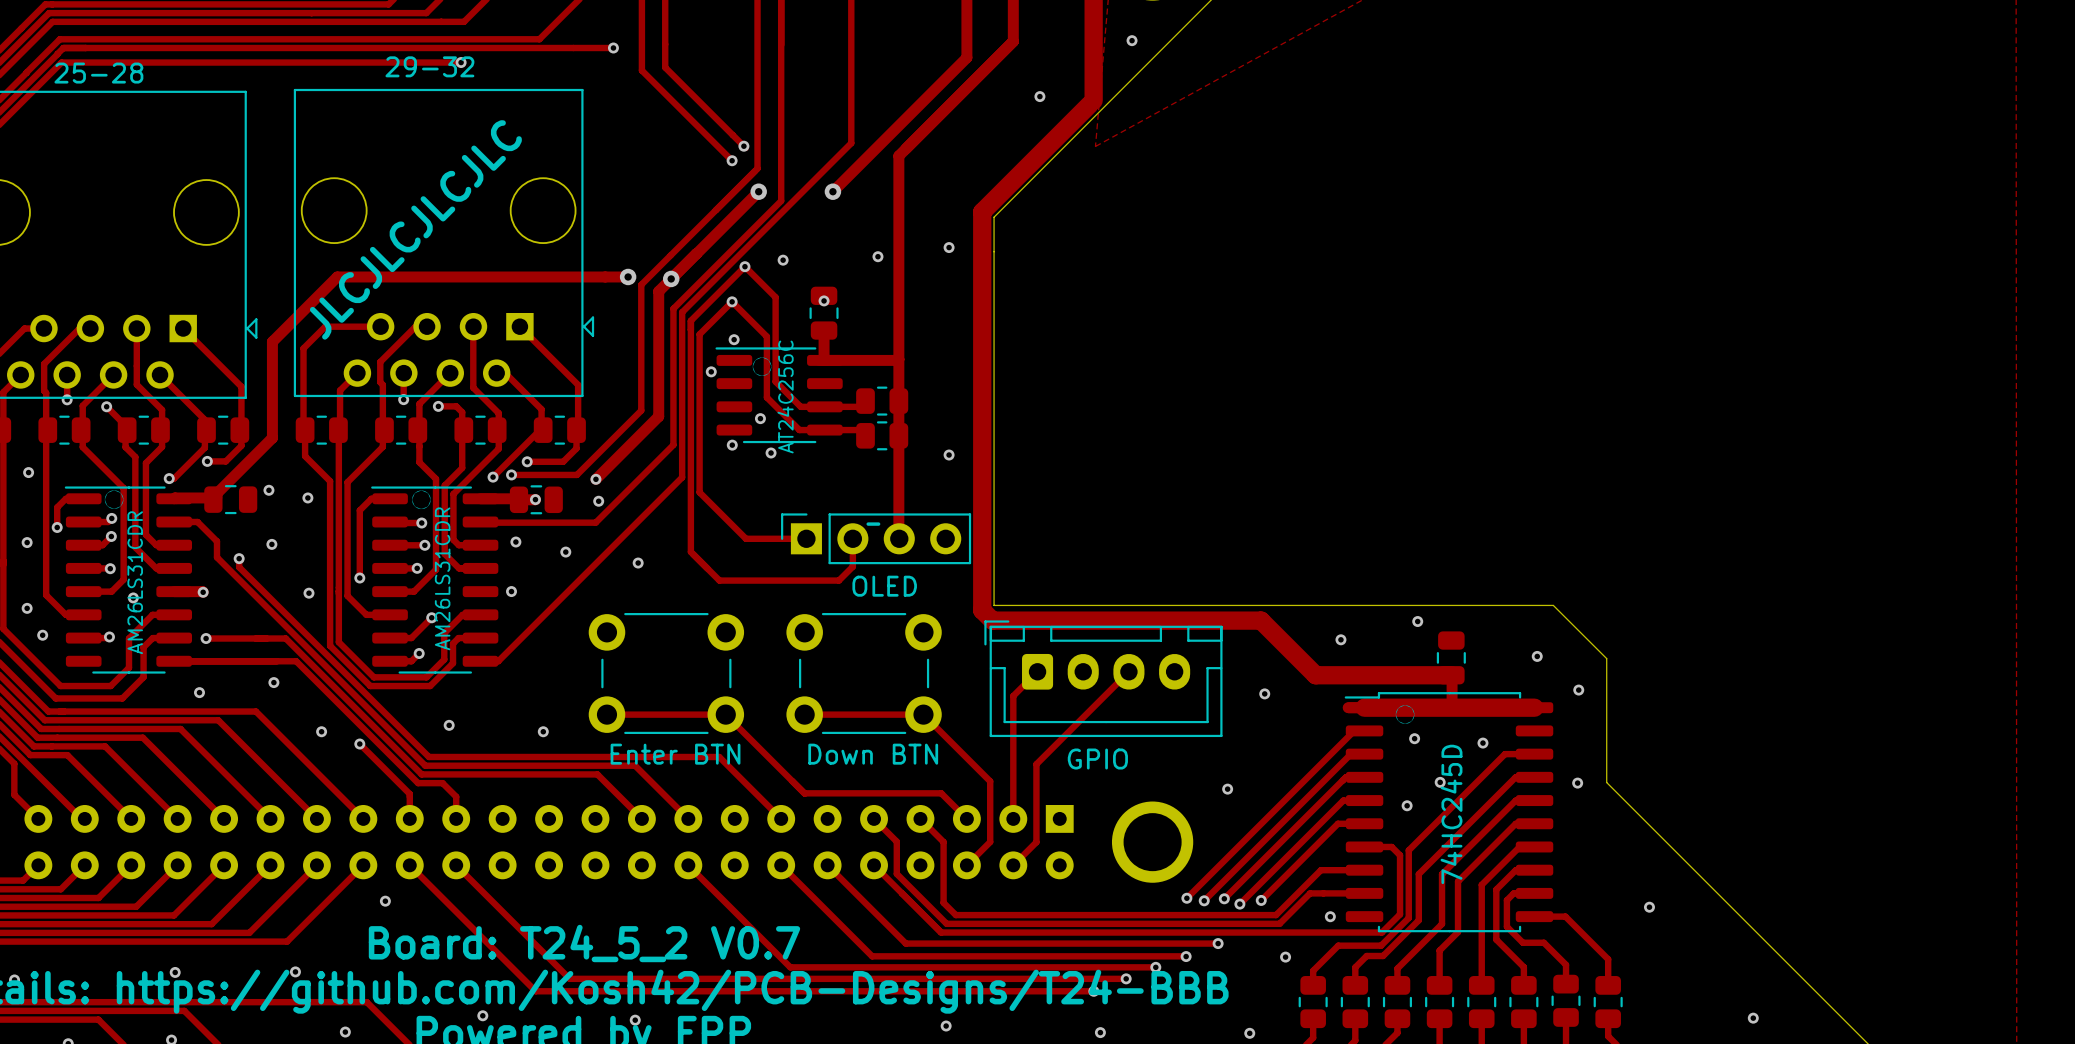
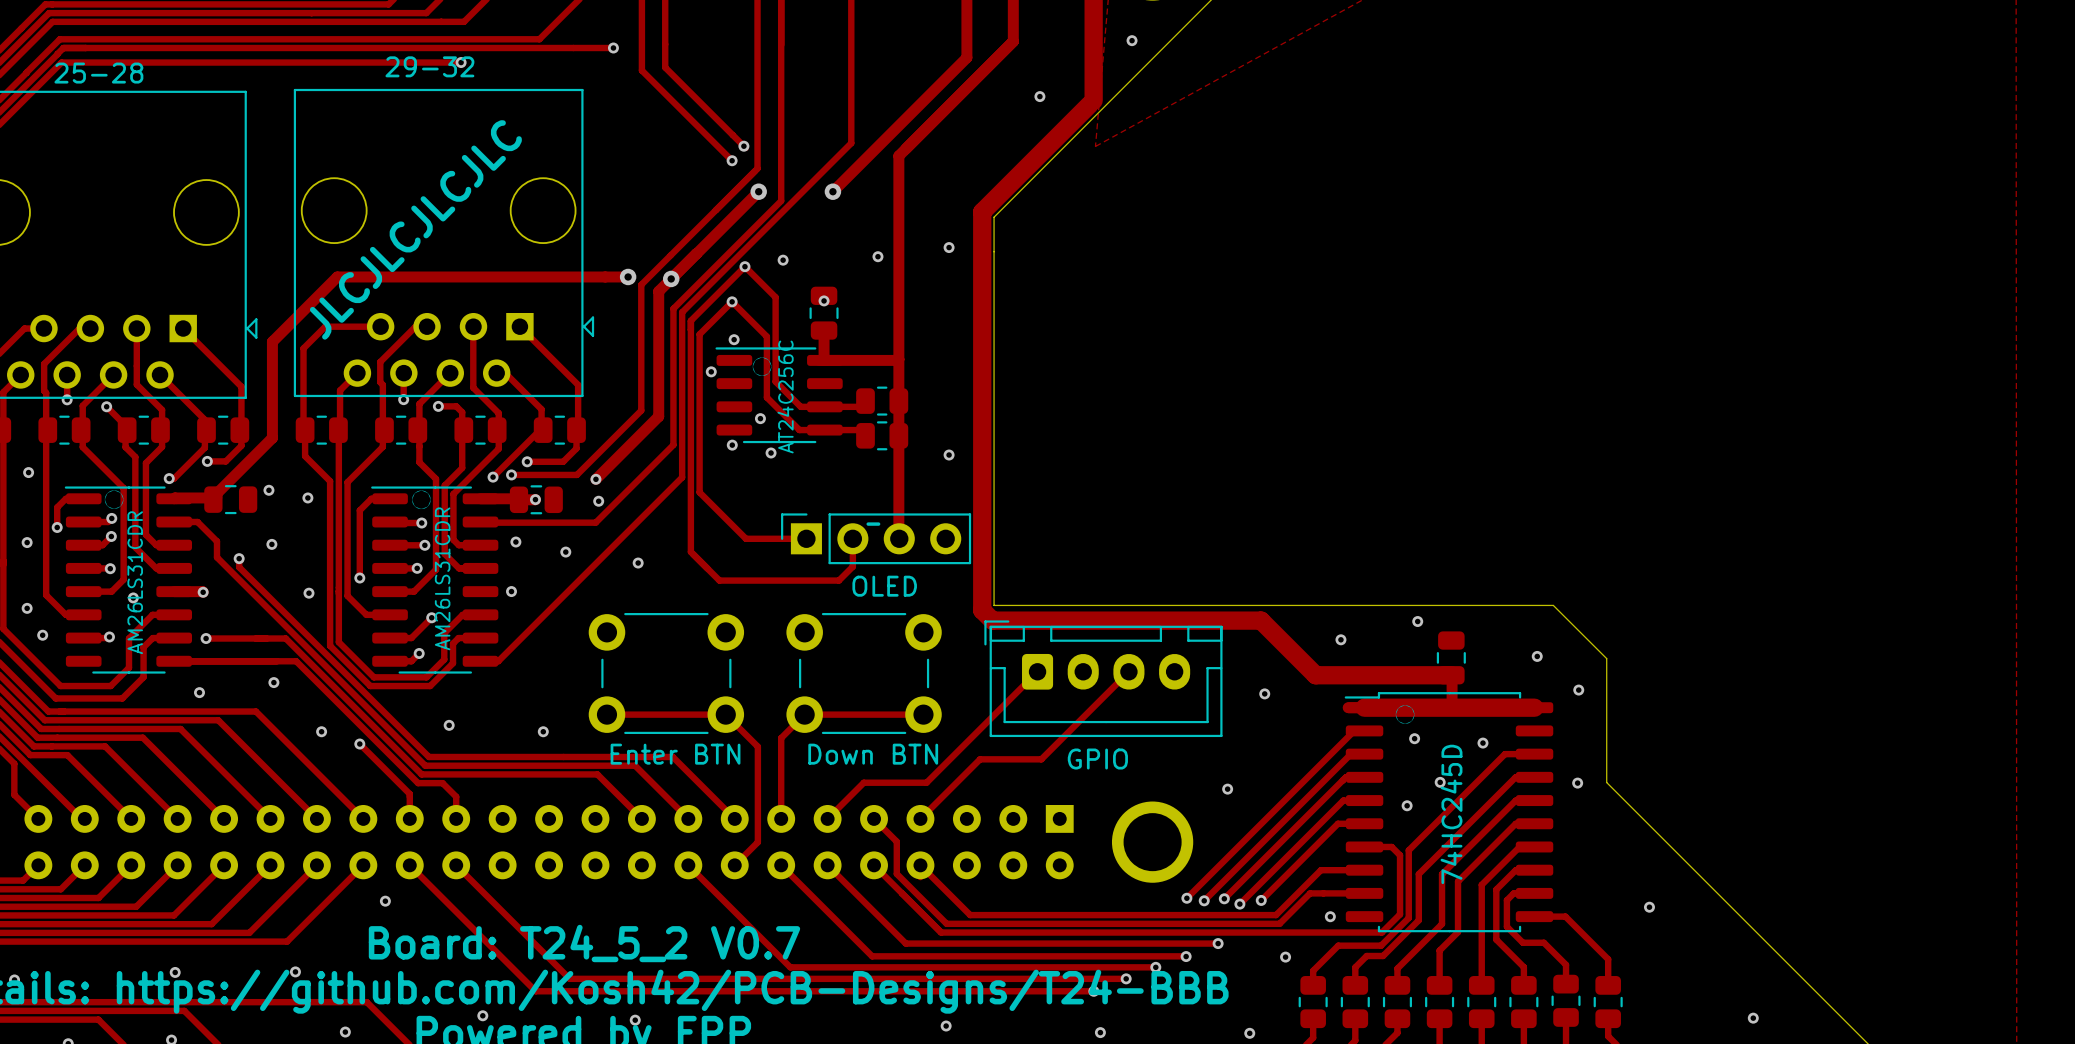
track: (1013, 696) (1013, 818) -> (1013, 696) (926, 782) (863, 782) (827, 818)
track: none -> (804, 714) (781, 738) (781, 818)
track: (923, 714) (990, 781) (990, 842) (966, 865) -> none
track: (757, 746) (804, 793) -> (757, 746) (757, 842) (734, 865)
track: (672, 757) (719, 757) (781, 818) -> (672, 757) (734, 818)
track: (1041, 759) (1036, 764) (1036, 842) (1013, 865) -> (1041, 759) (980, 759) (920, 818)
track: (804, 793) (941, 793) (966, 818) -> none
track: (920, 818) (943, 842) (943, 902) (955, 915) (970, 915) -> (920, 877) (920, 865) (970, 915)

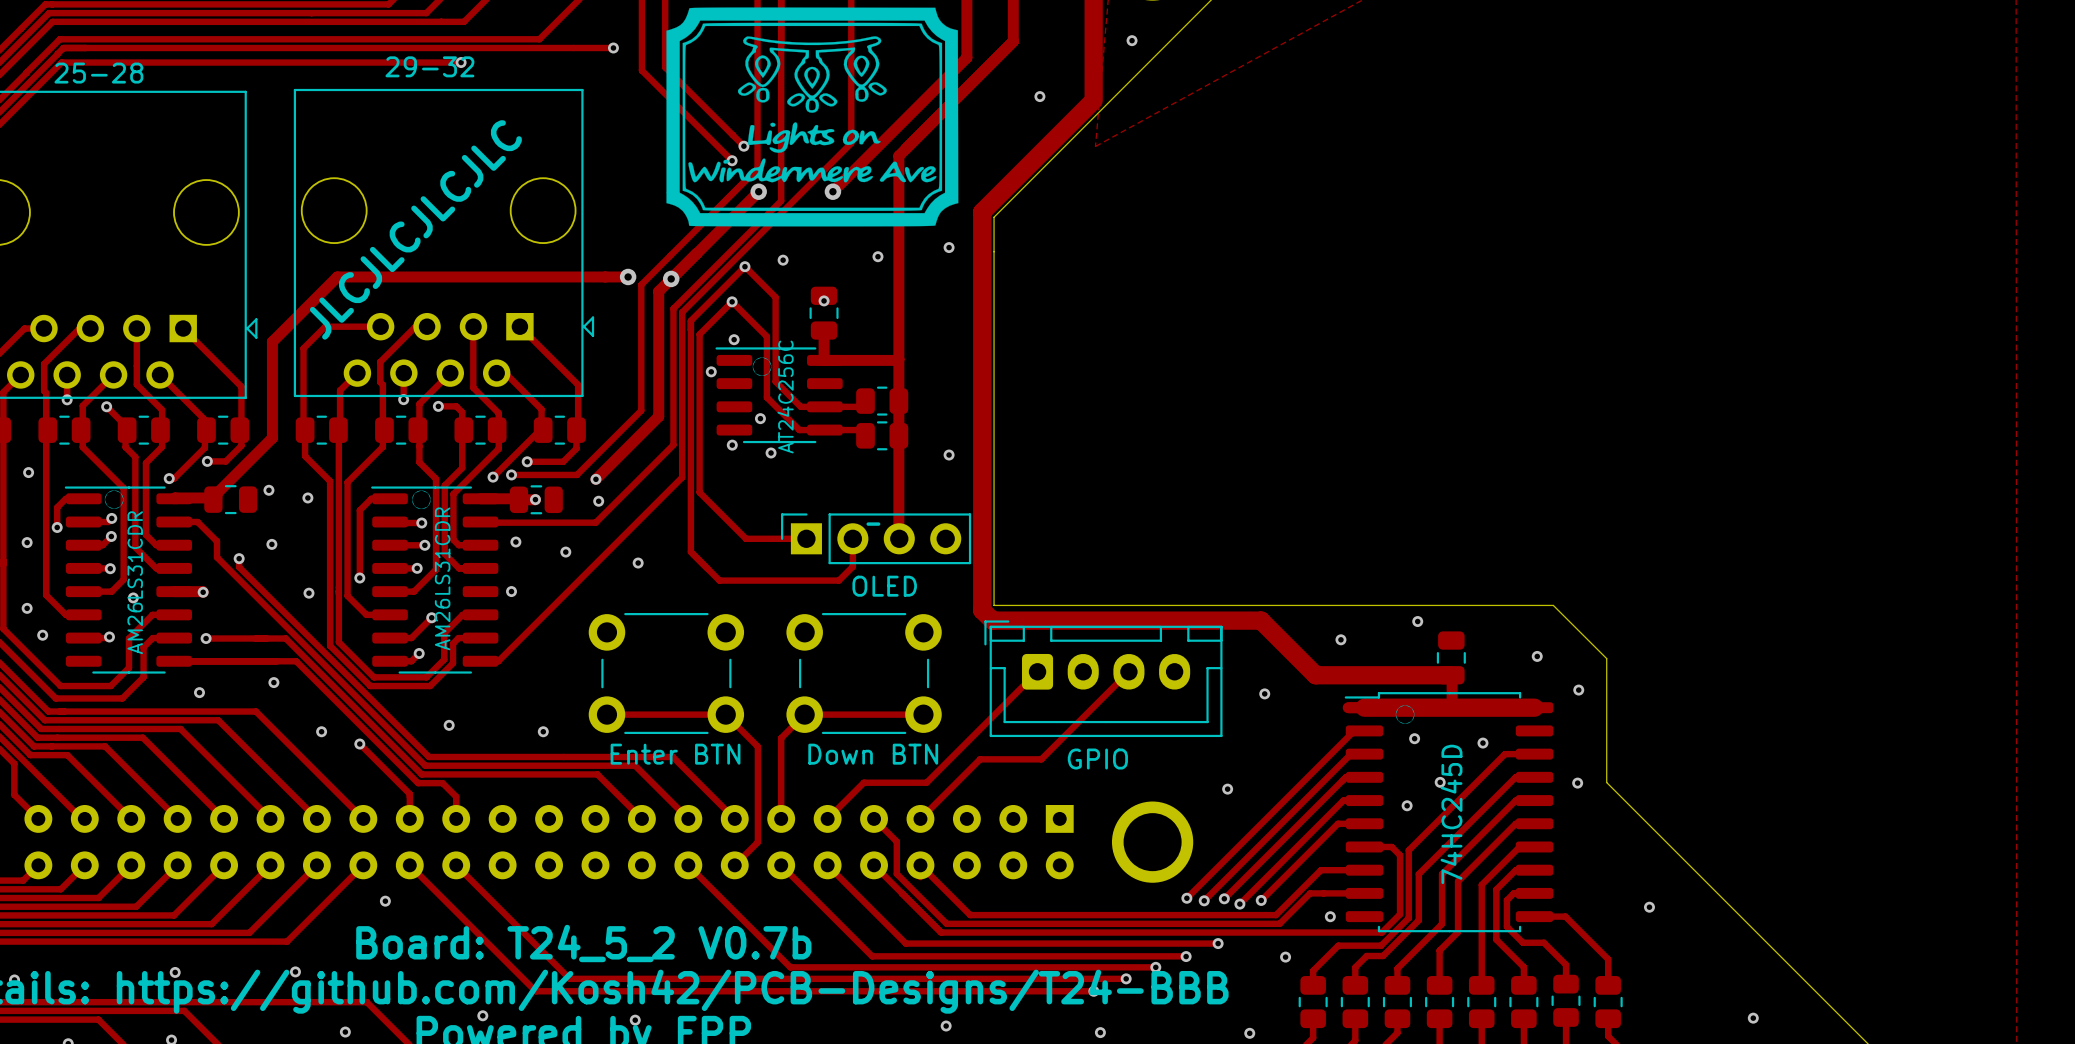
drawing: none -> [666, 7, 959, 227]
text: Board: T24_5_2 V0.7 (584, 943) -> Board: T24_5_2 V0.7b (583, 943)

